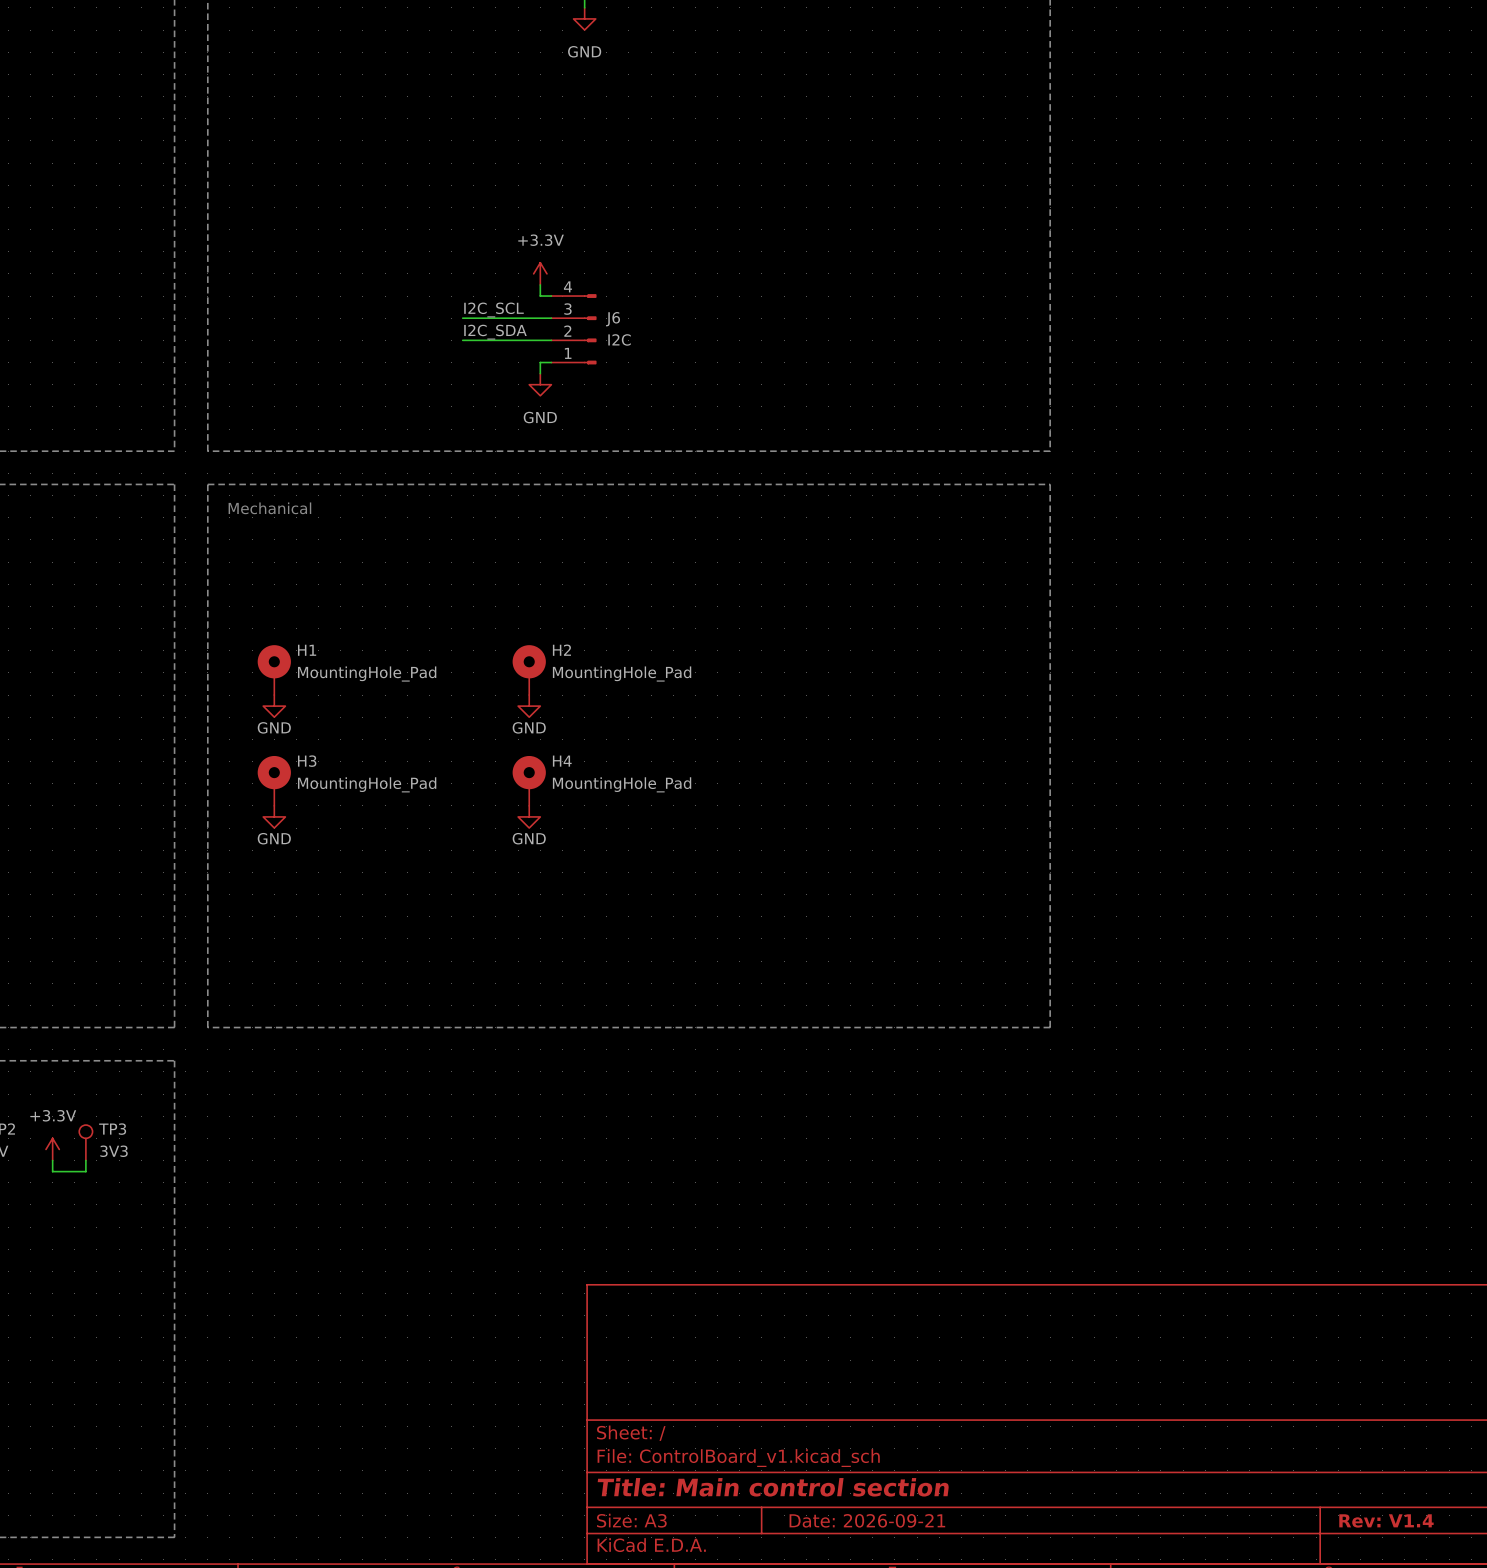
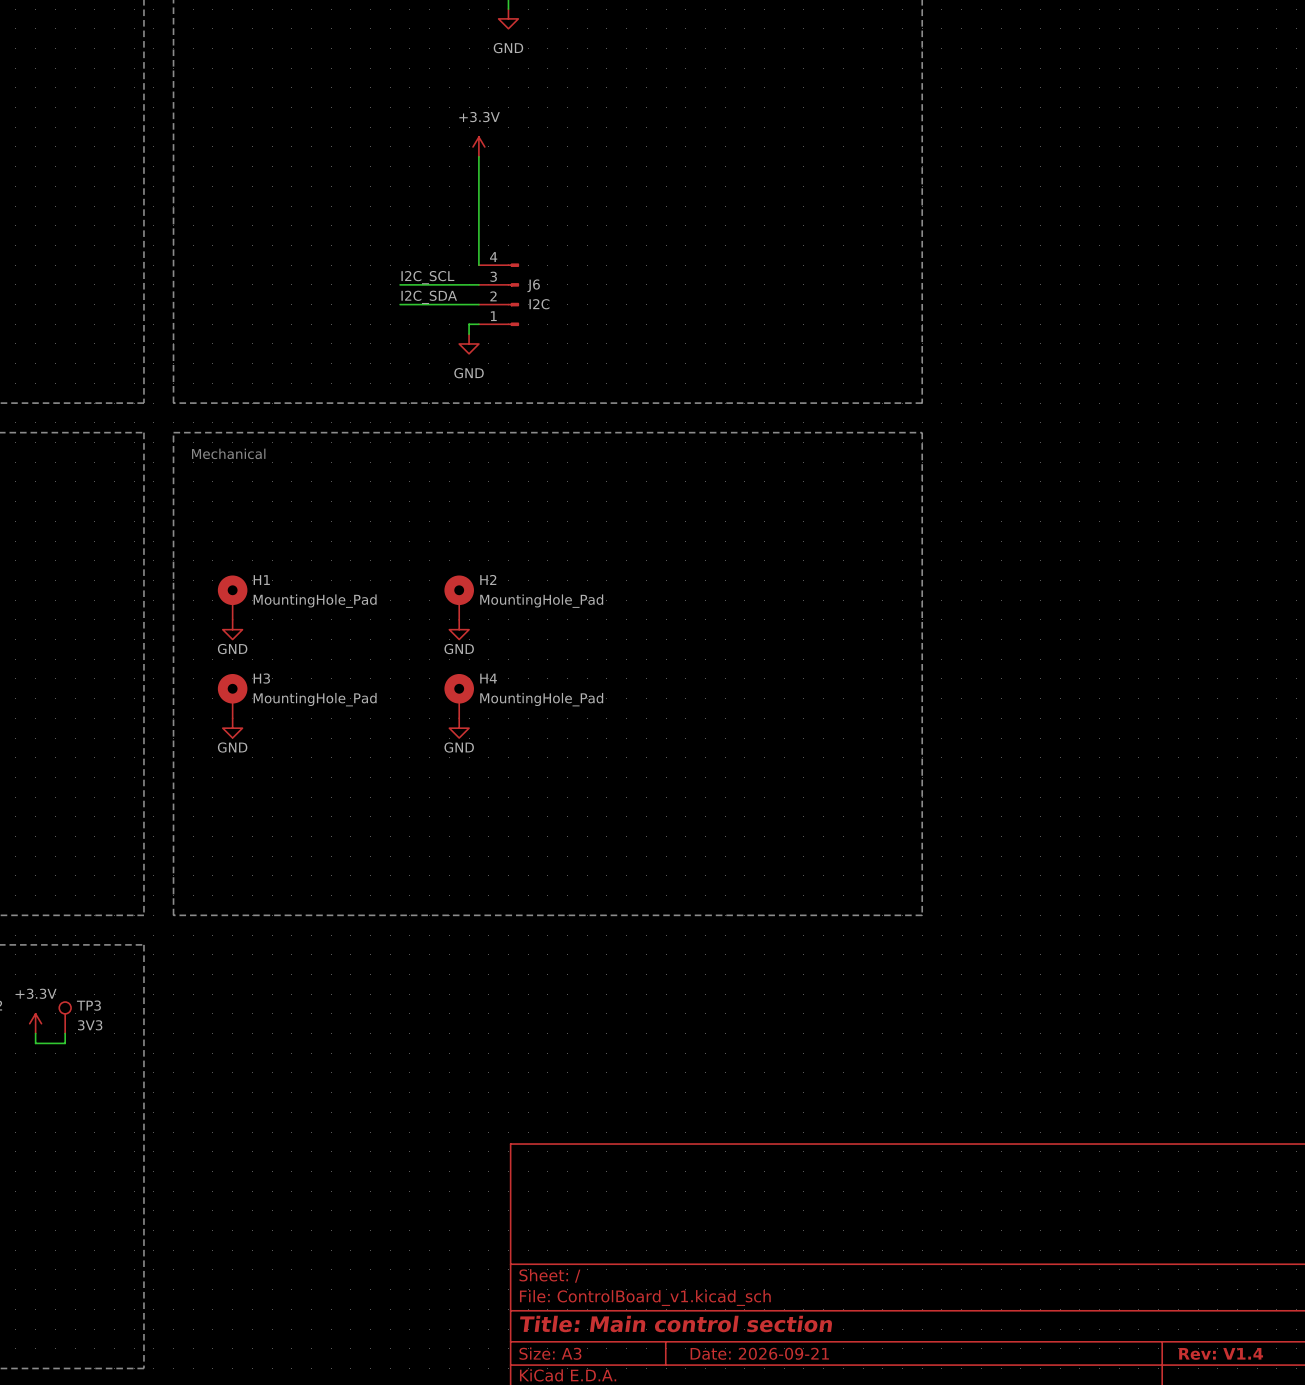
power symbol position: +3.3V (540, 273) -> +3.3V (478, 146)
wire: (540, 284) (540, 296) (551, 296) -> (478, 156) (478, 265)

